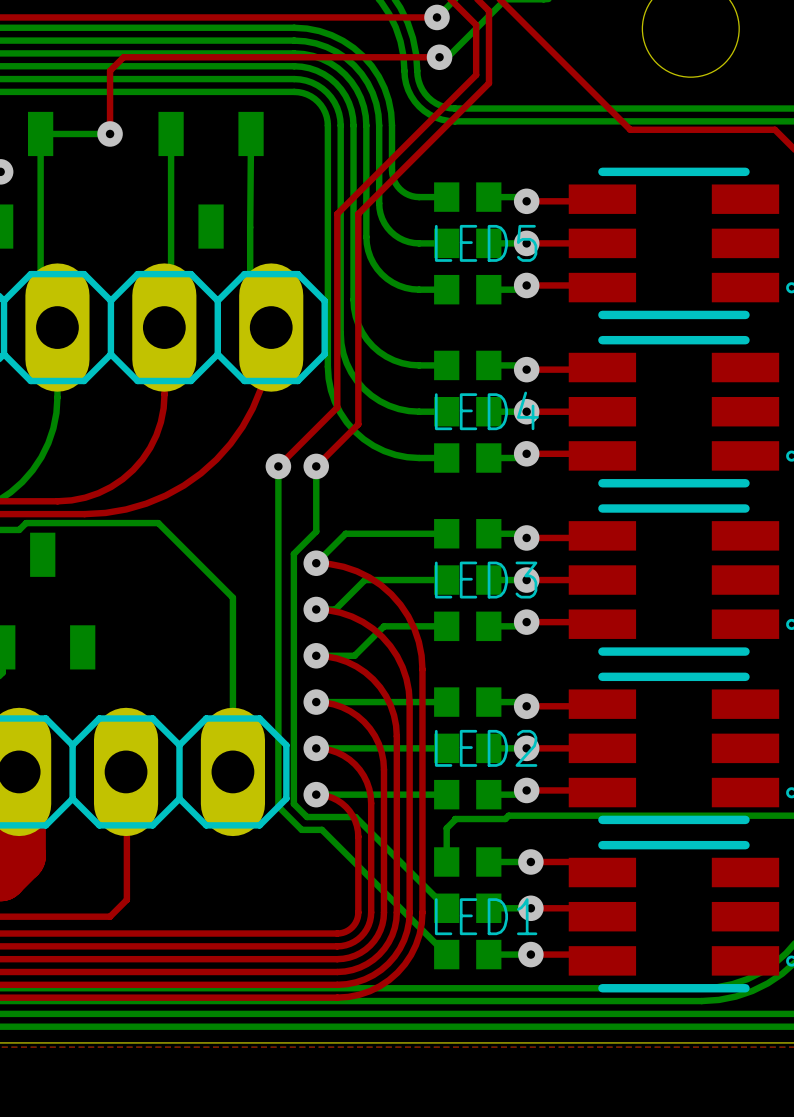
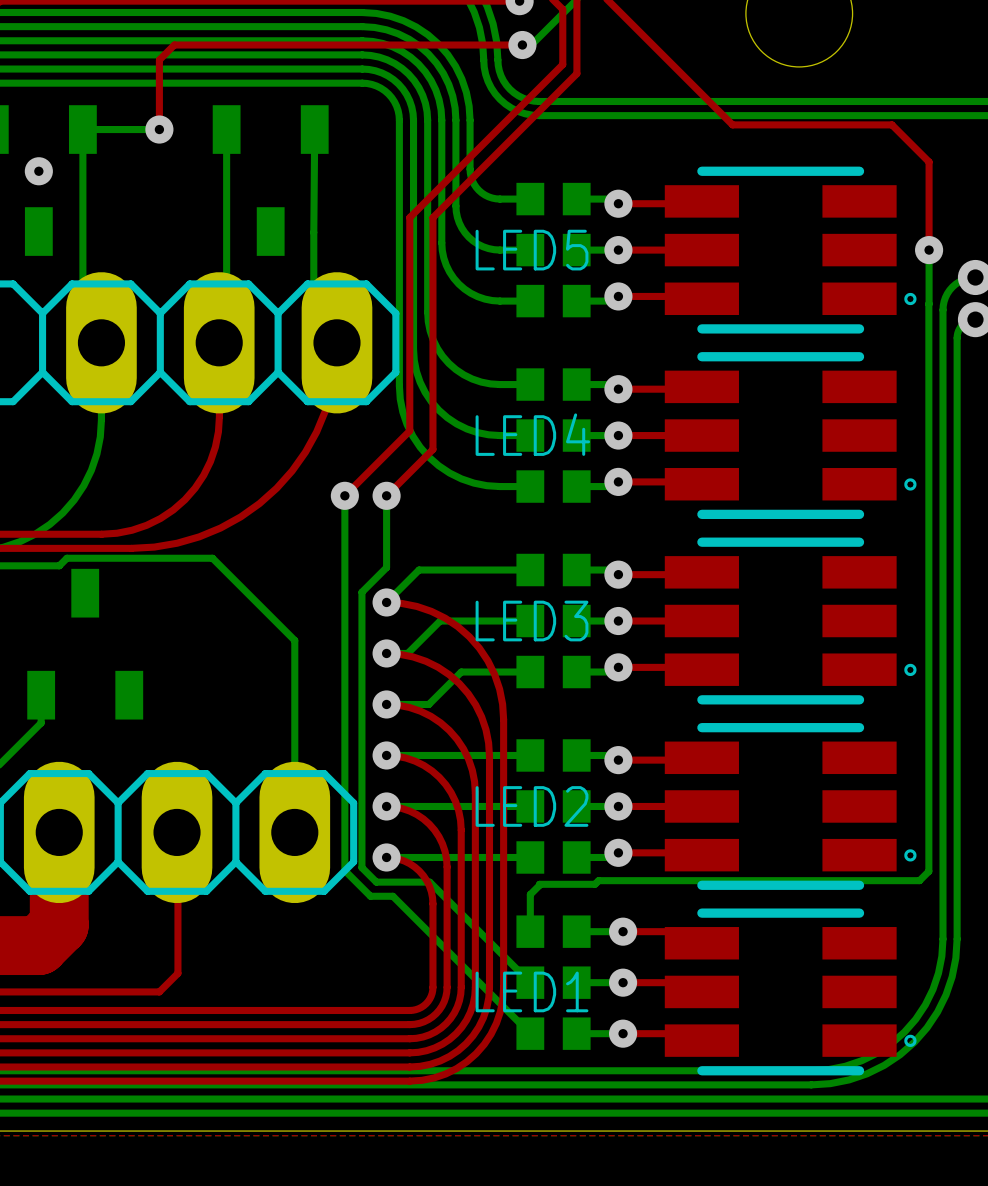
LED5 name position: LED5 (486, 243) -> LED5 (532, 250)
LED4 name position: LED4 (486, 410) -> LED4 (532, 434)
LED3 name position: LED3 (486, 580) -> LED3 (532, 621)
LED2 name position: LED2 (486, 748) -> LED2 (532, 806)
LED1 name position: LED1 (486, 916) -> LED1 (532, 991)

